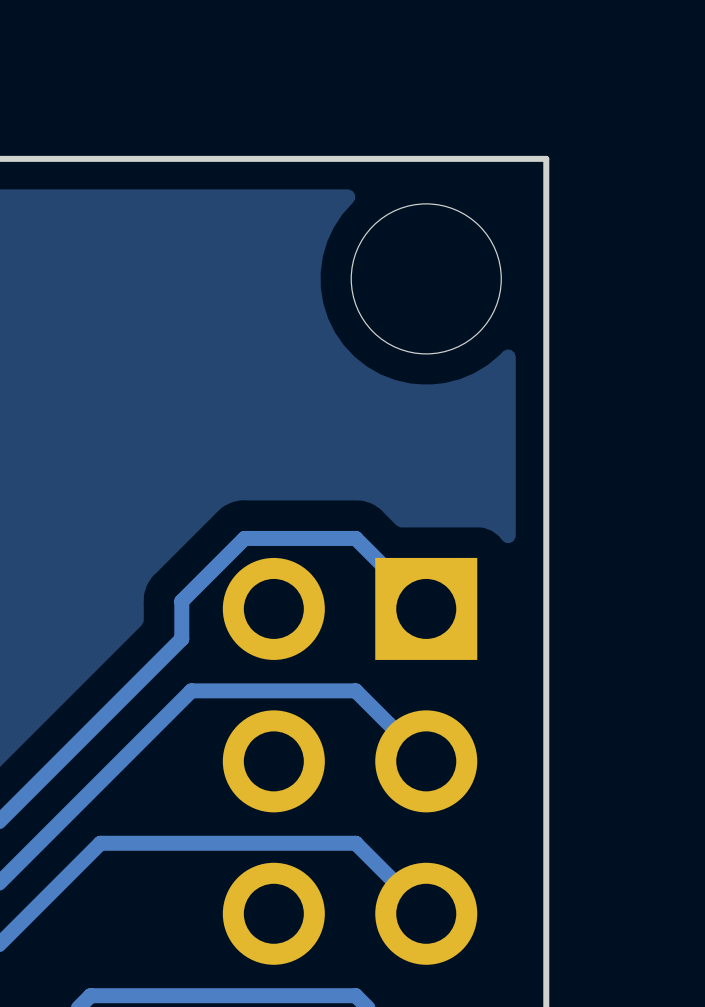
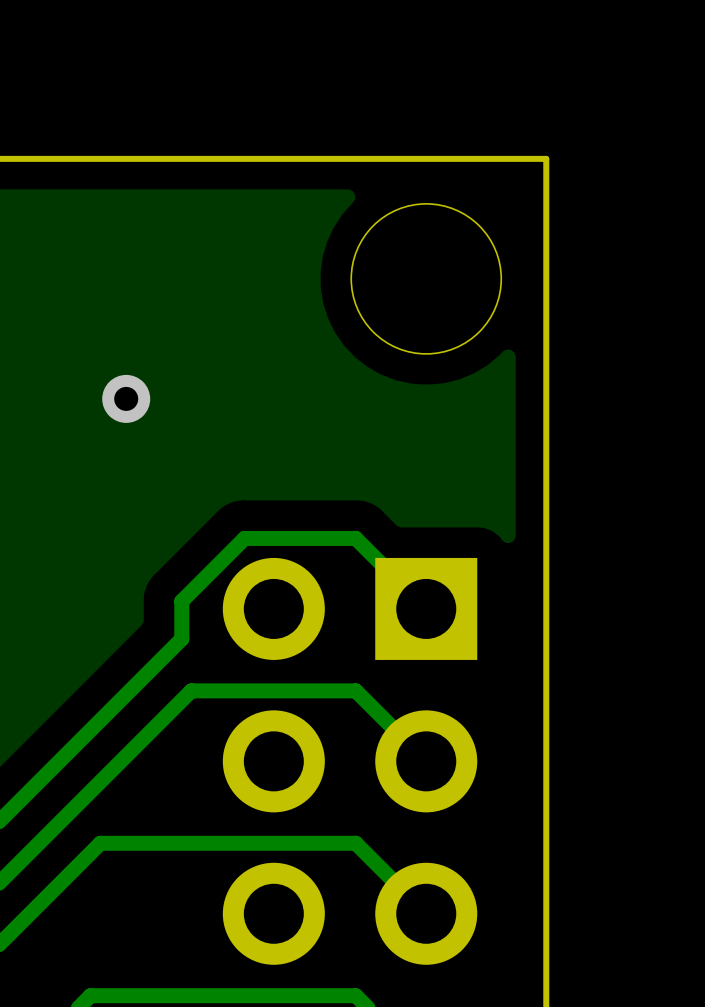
via: none -> (126, 398)

